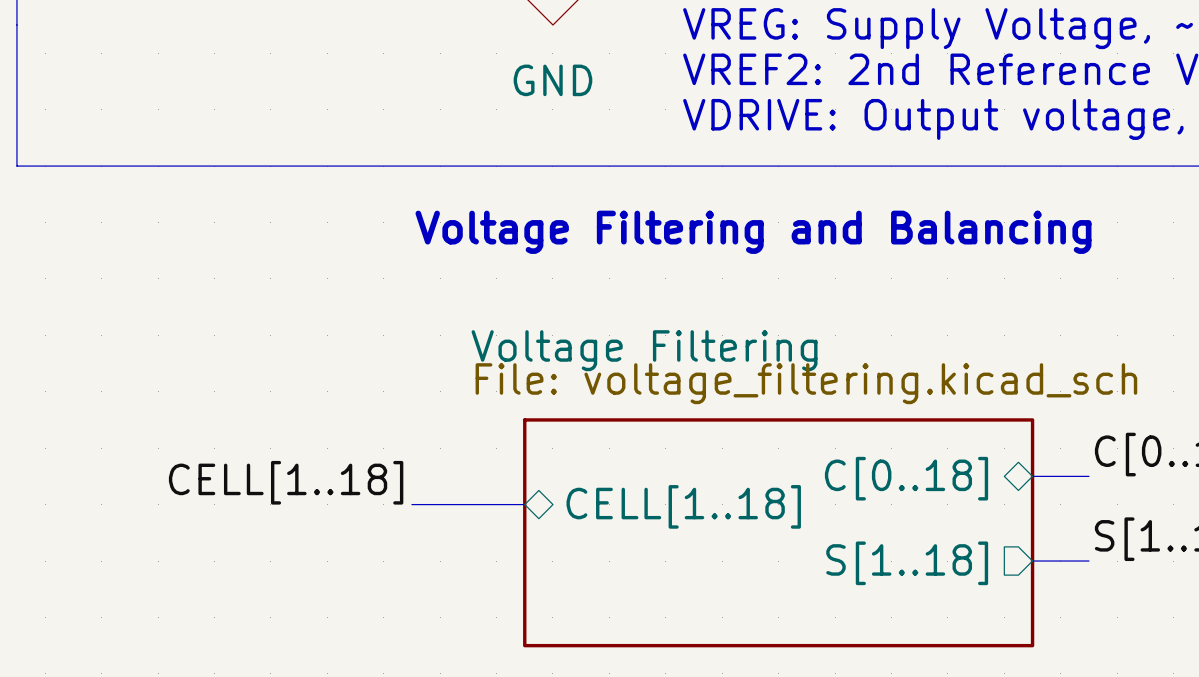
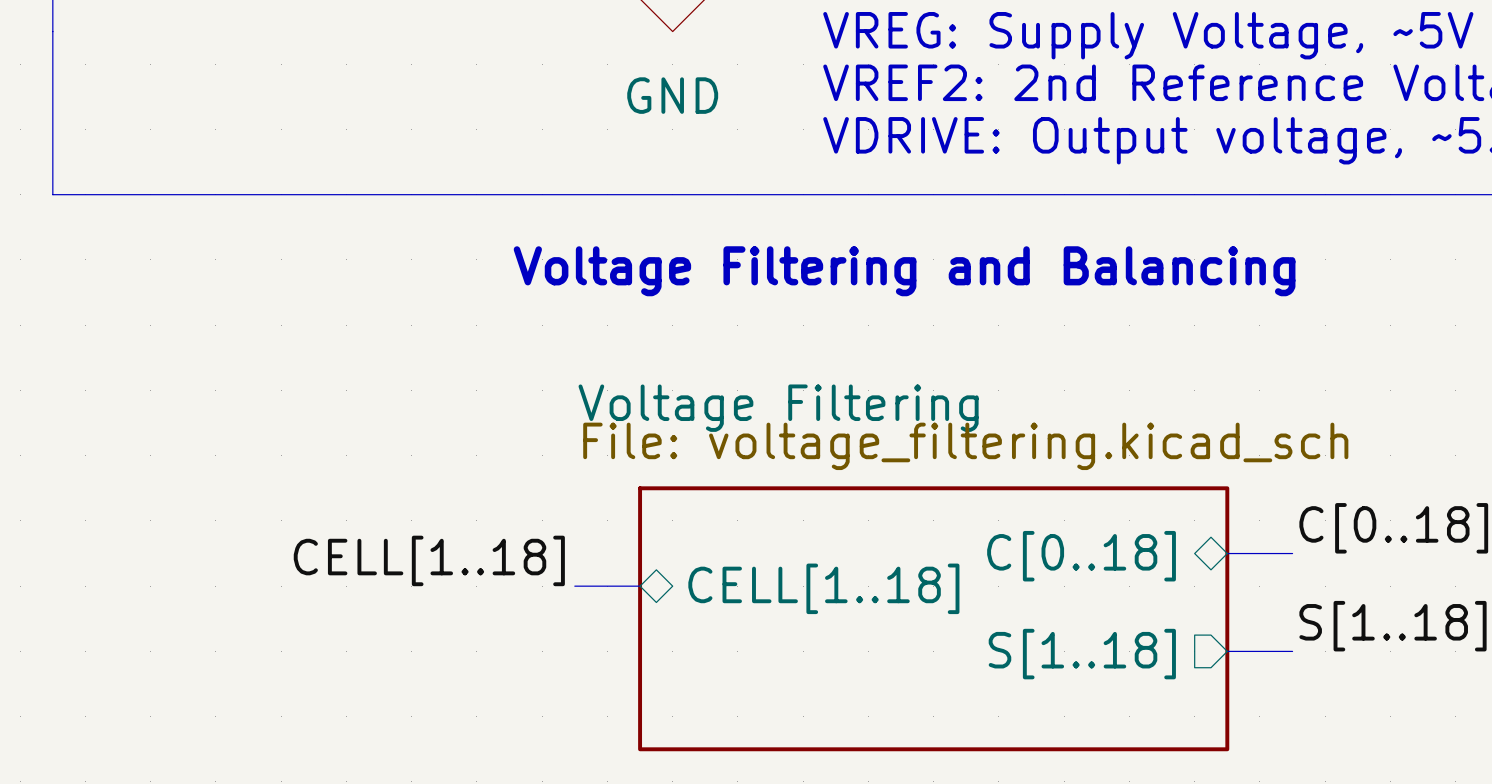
label position: CELL[1..18] (286, 482) -> CELL[1..18] (429, 560)
bus: (411, 504) (468, 504) -> none

